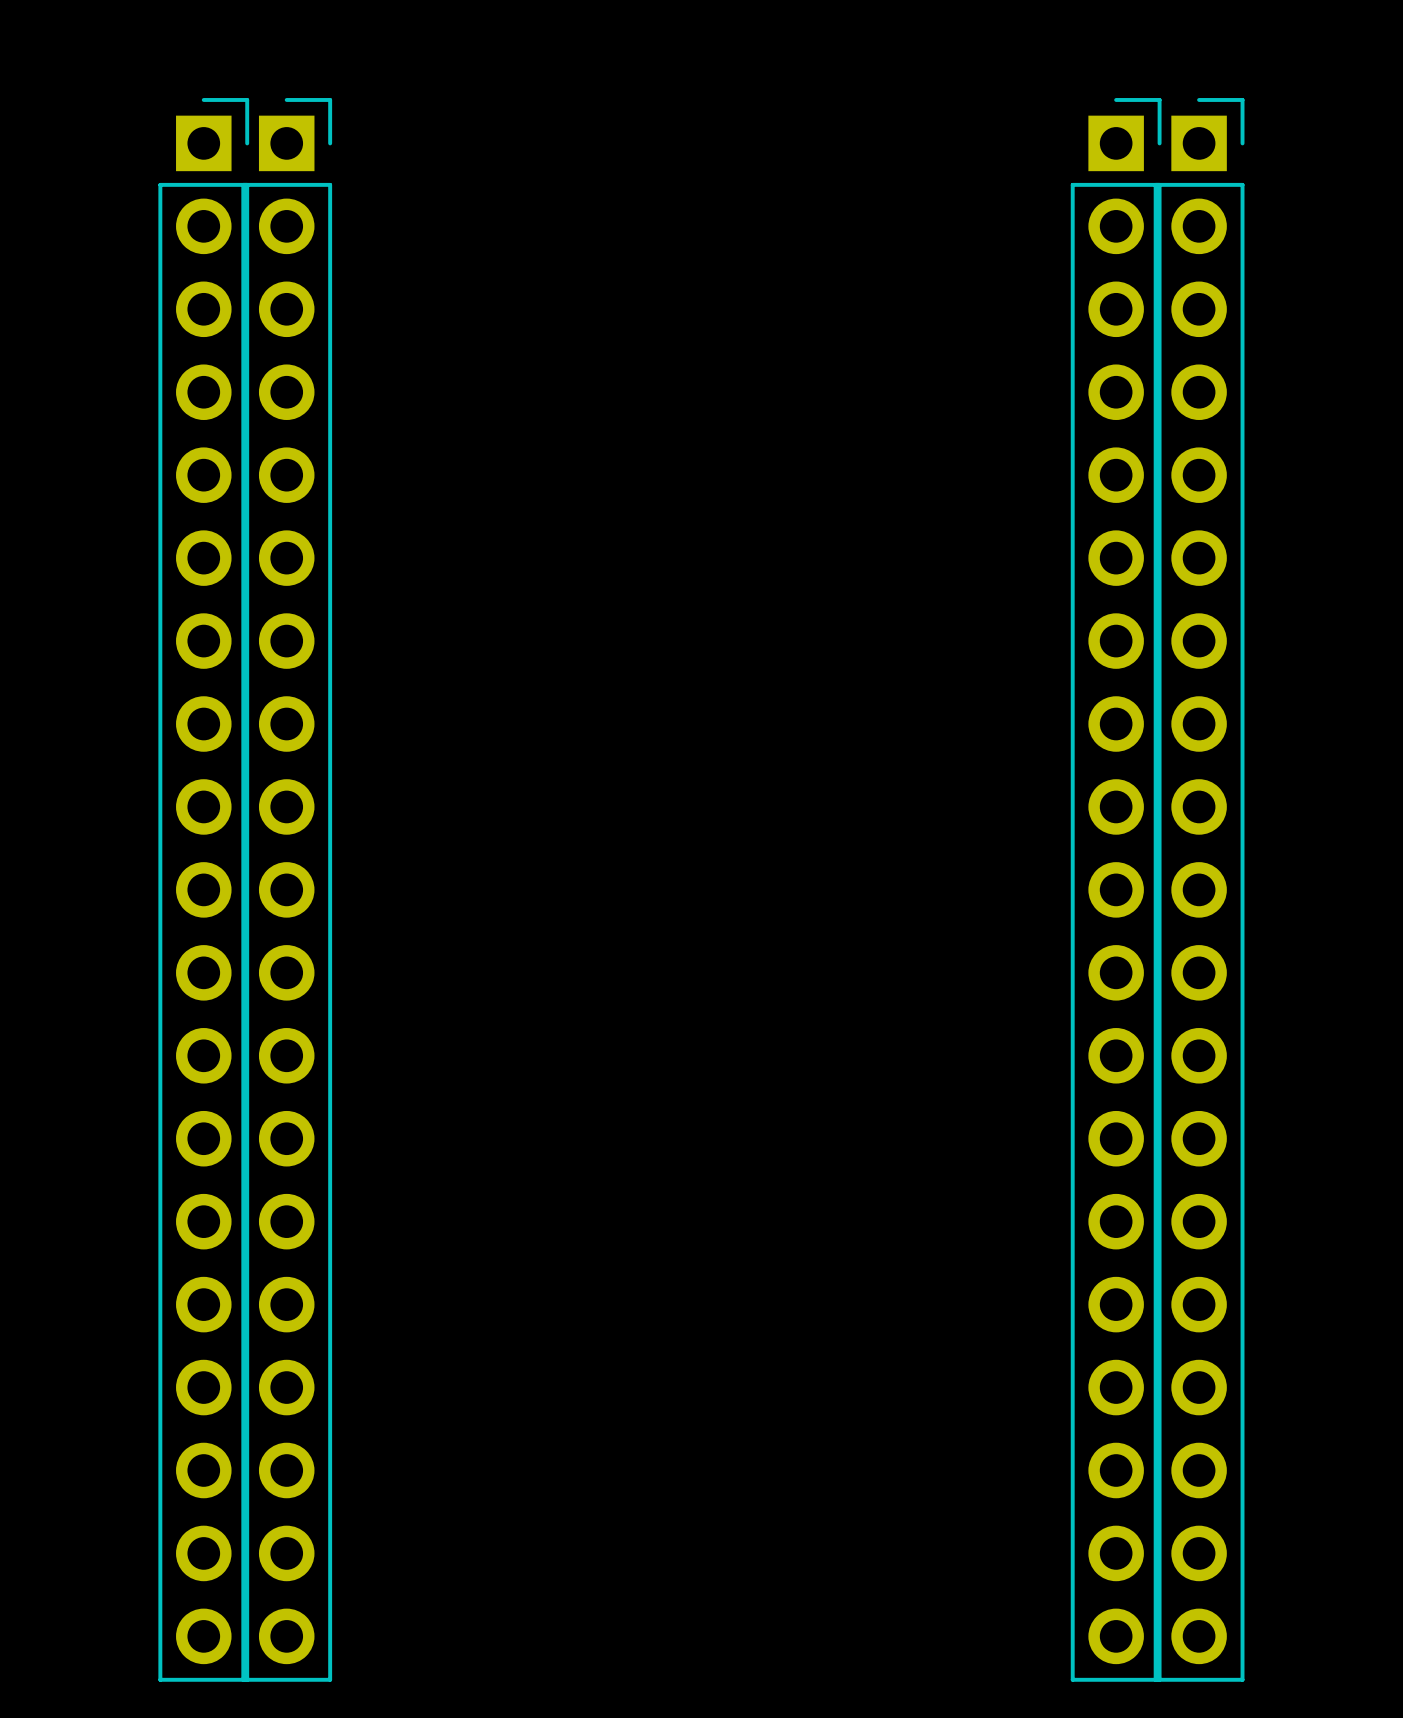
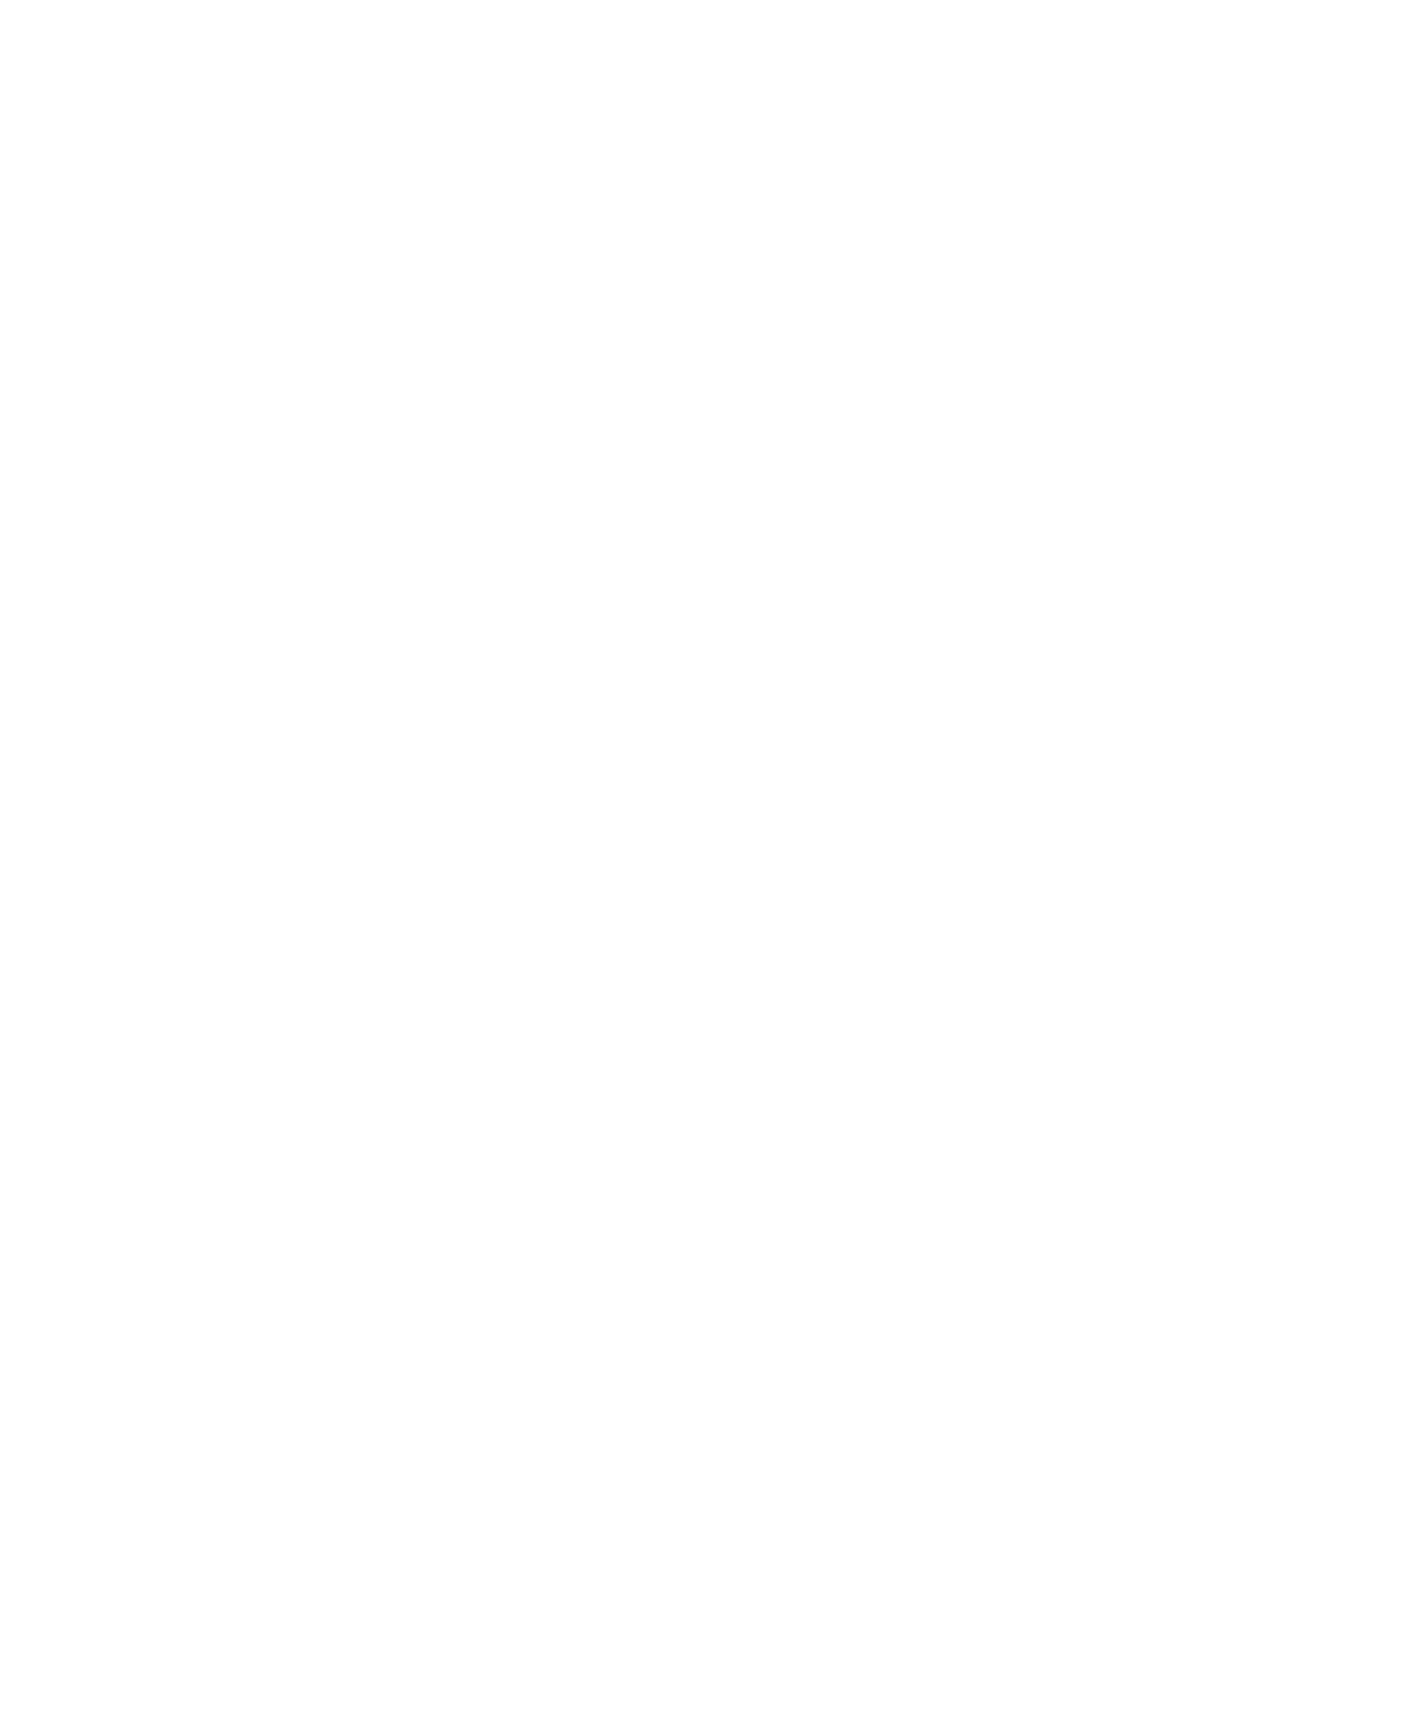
part: (203, 889) -> none
part: (286, 889) -> none
part: (1116, 889) -> none
part: (1199, 889) -> none

